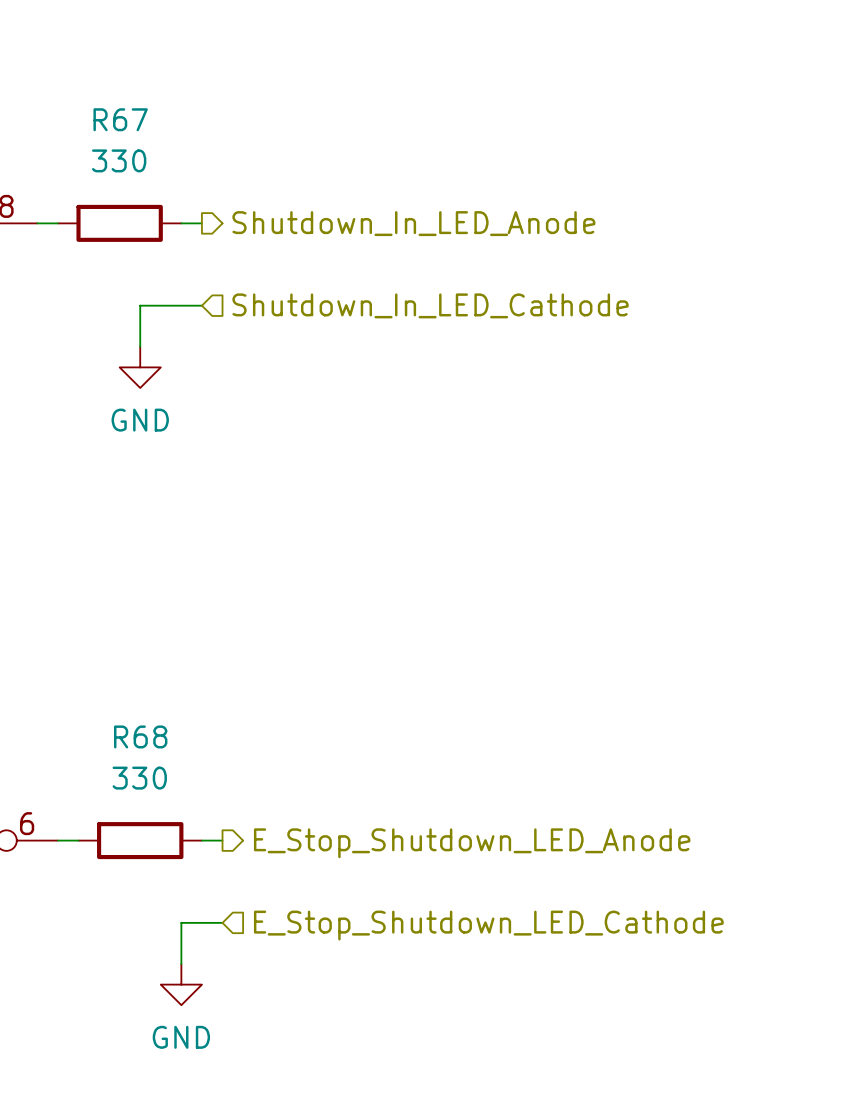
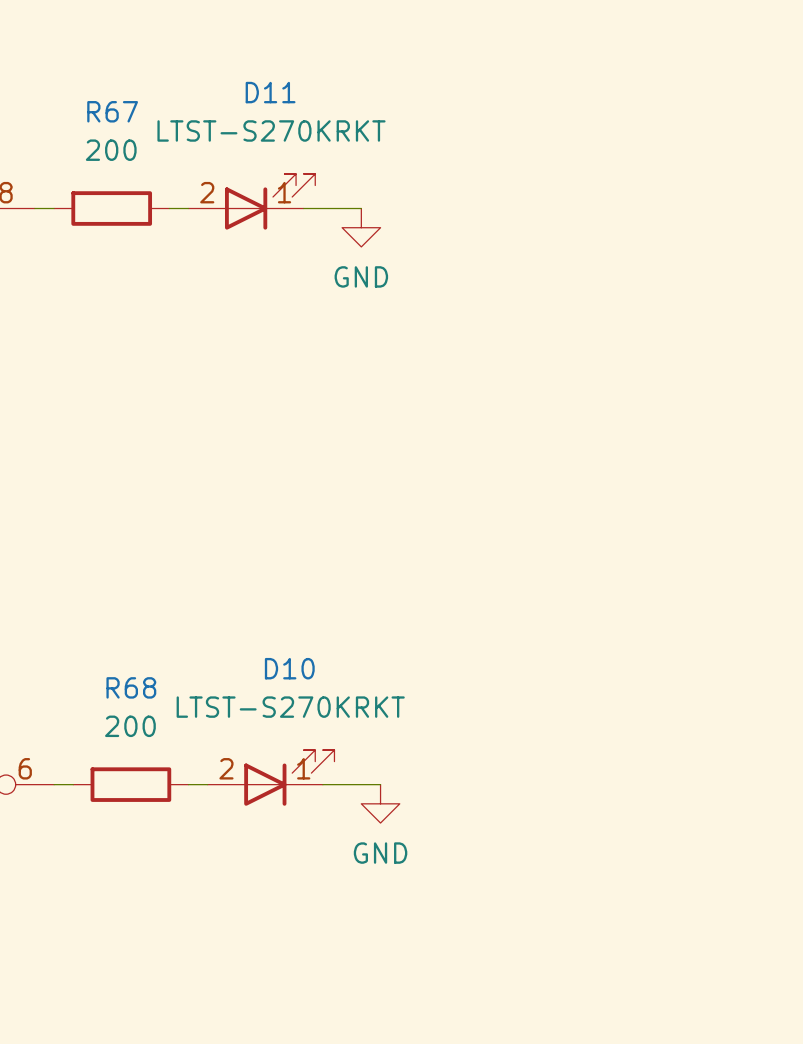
R67 value: 330 (119, 160) -> 200 (111, 150)
D11: none -> LTST-S270KRKT (251, 201)
wire: none -> (303, 208) (361, 208)
hierarchical label: Shutdown_In_LED_Anode (413, 223) -> none
wire: (201, 305) (140, 305) (140, 346) -> none
hierarchical label: Shutdown_In_LED_Cathode (430, 305) -> none
power symbol position: GND (140, 367) -> GND (361, 227)
R68 value: 330 (139, 778) -> 200 (130, 726)
D10: none -> LTST-S270KRKT (271, 777)
wire: none -> (322, 784) (380, 784)
hierarchical label: E_Stop_Shutdown_LED_Anode (472, 843) -> none
wire: (222, 922) (181, 922) (181, 964) -> none
hierarchical label: E_Stop_Shutdown_LED_Cathode (488, 925) -> none
power symbol position: GND (181, 984) -> GND (380, 803)

